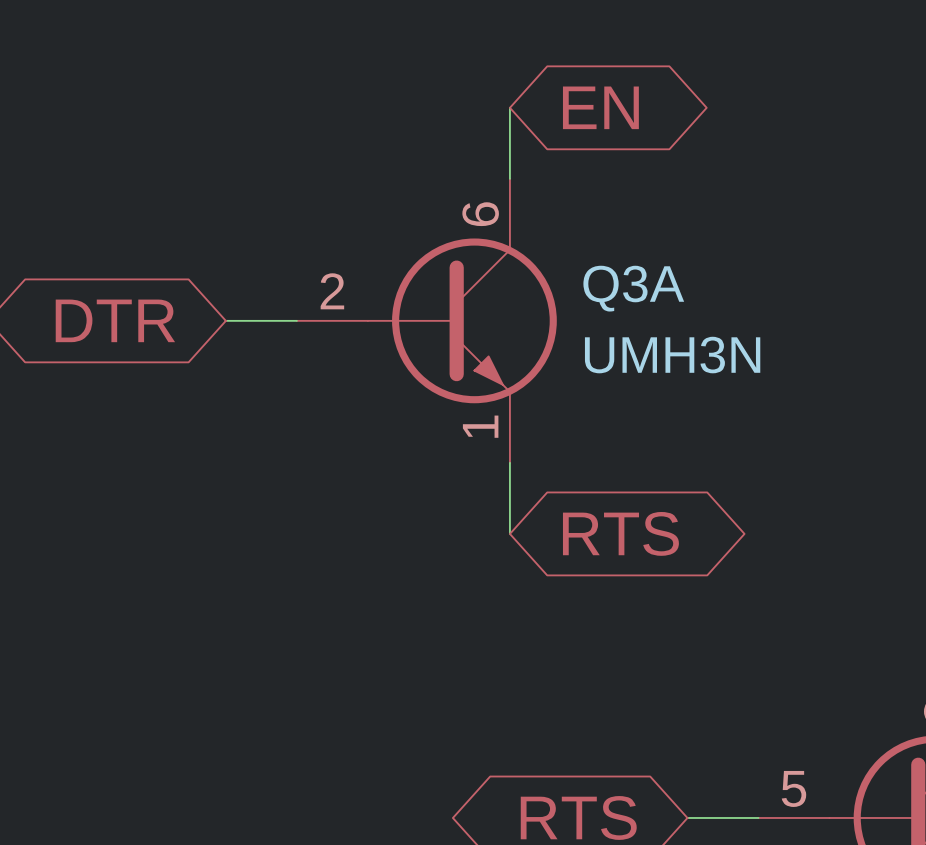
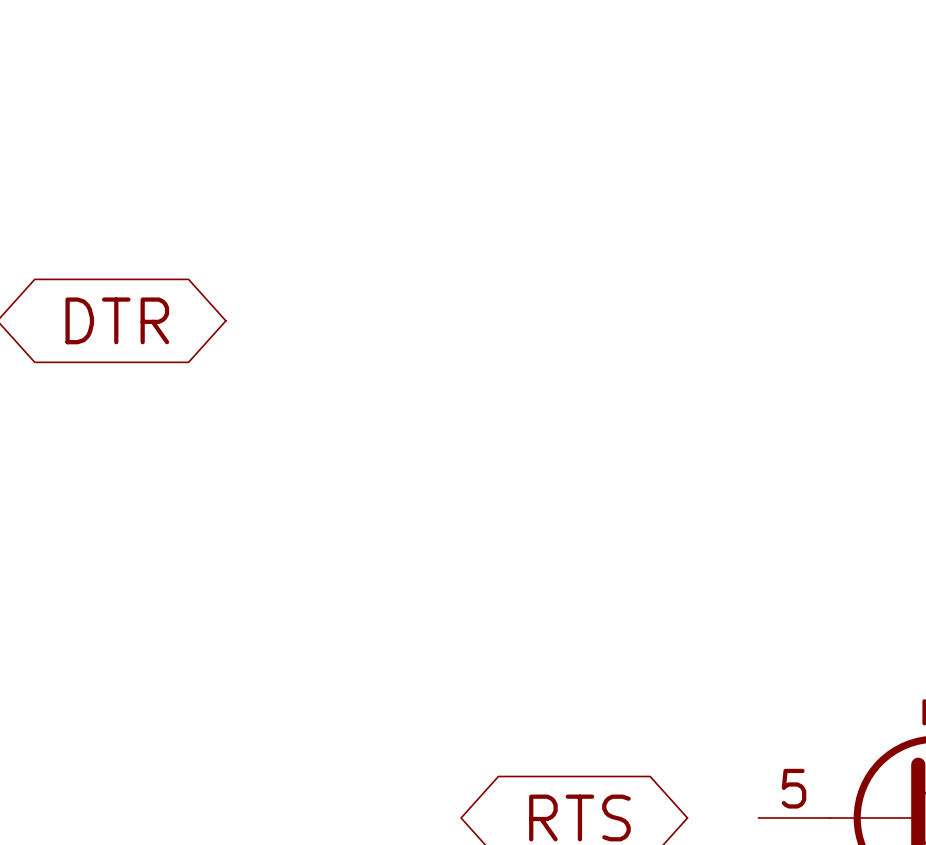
wire: (509, 107) (509, 178) -> none
global label: EN (600, 107) -> none
wire: (225, 320) (296, 320) -> none
Q3A: UMH3N (426, 320) -> none
wire: (509, 462) (509, 533) -> none
global label: RTS (620, 533) -> none
wire: (687, 817) (758, 817) -> none

